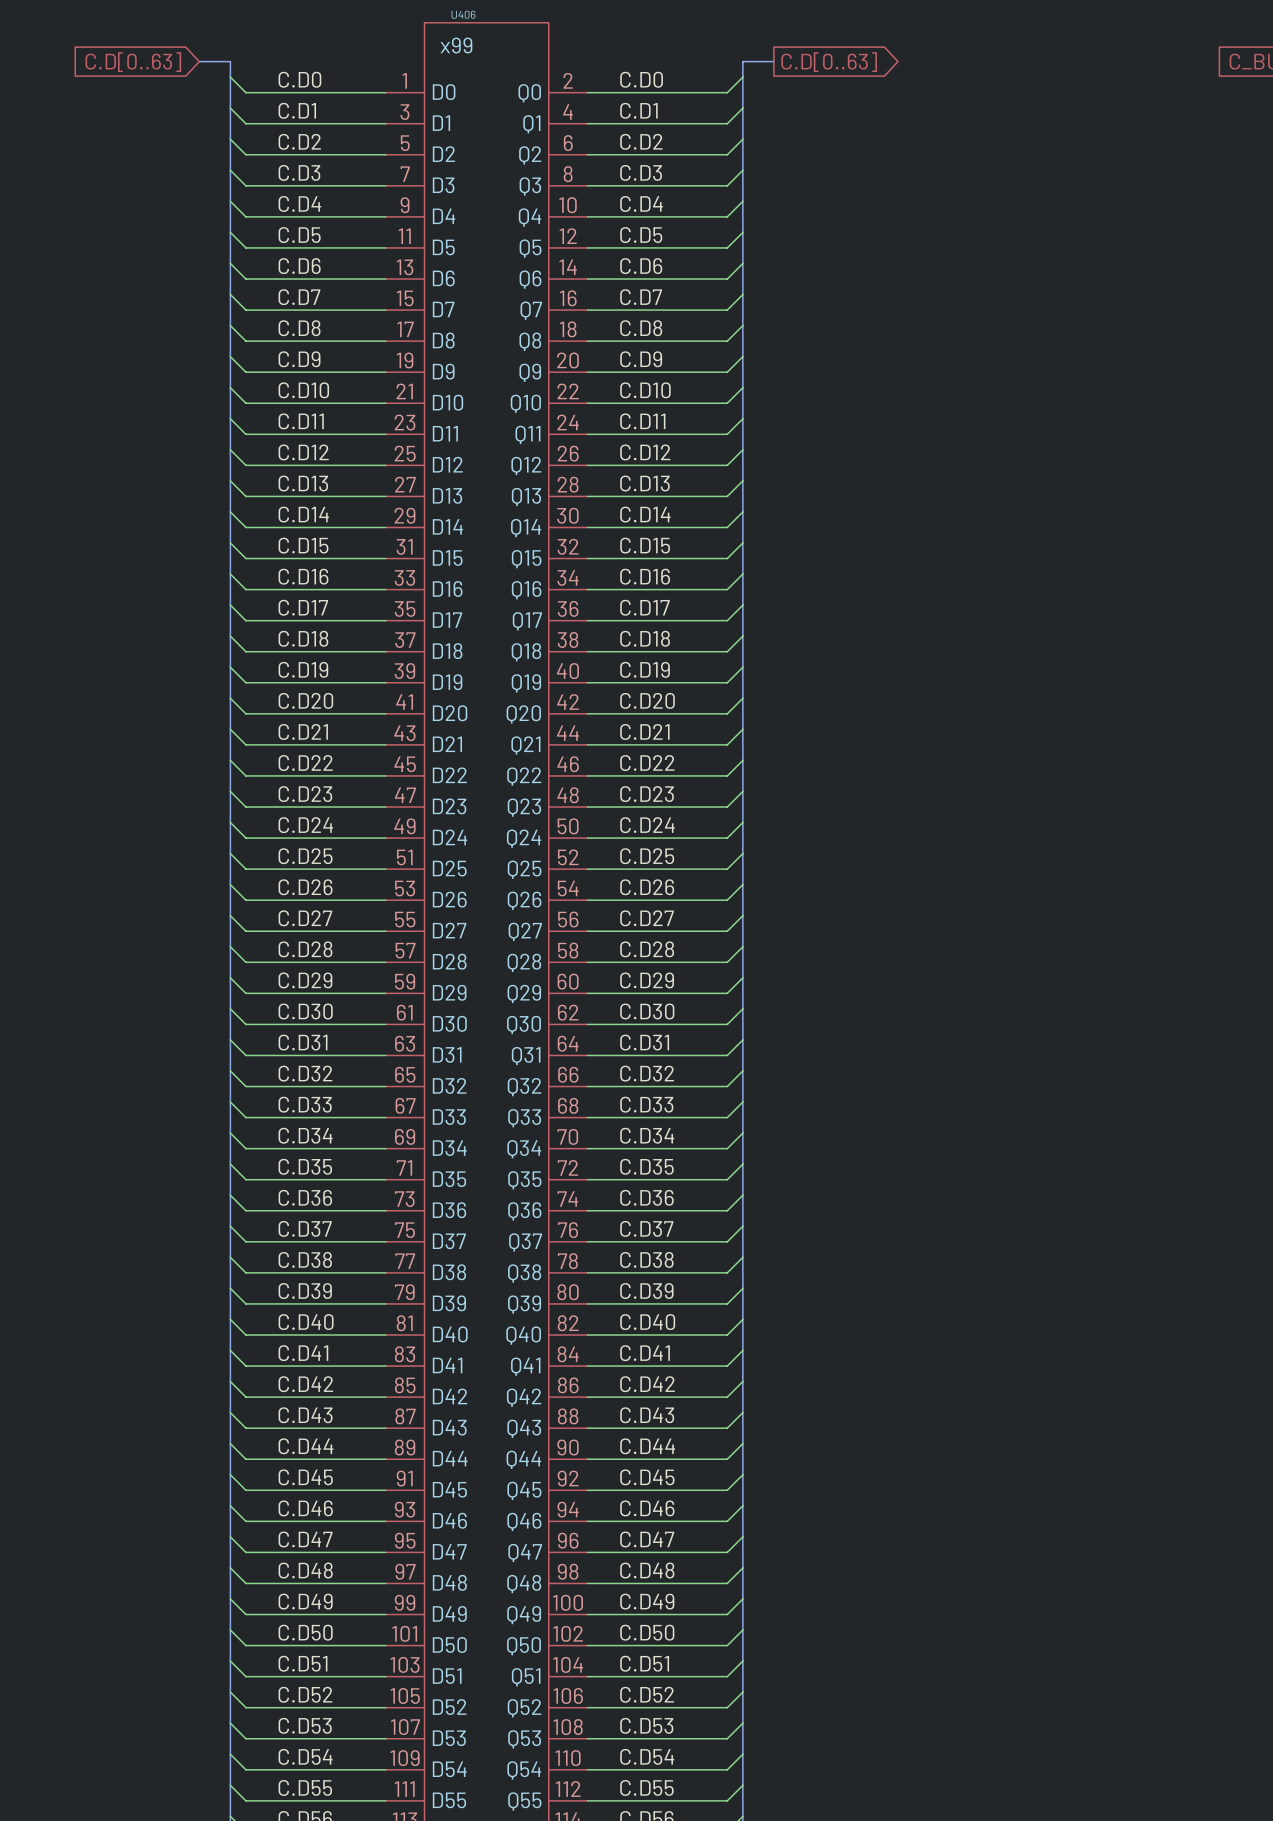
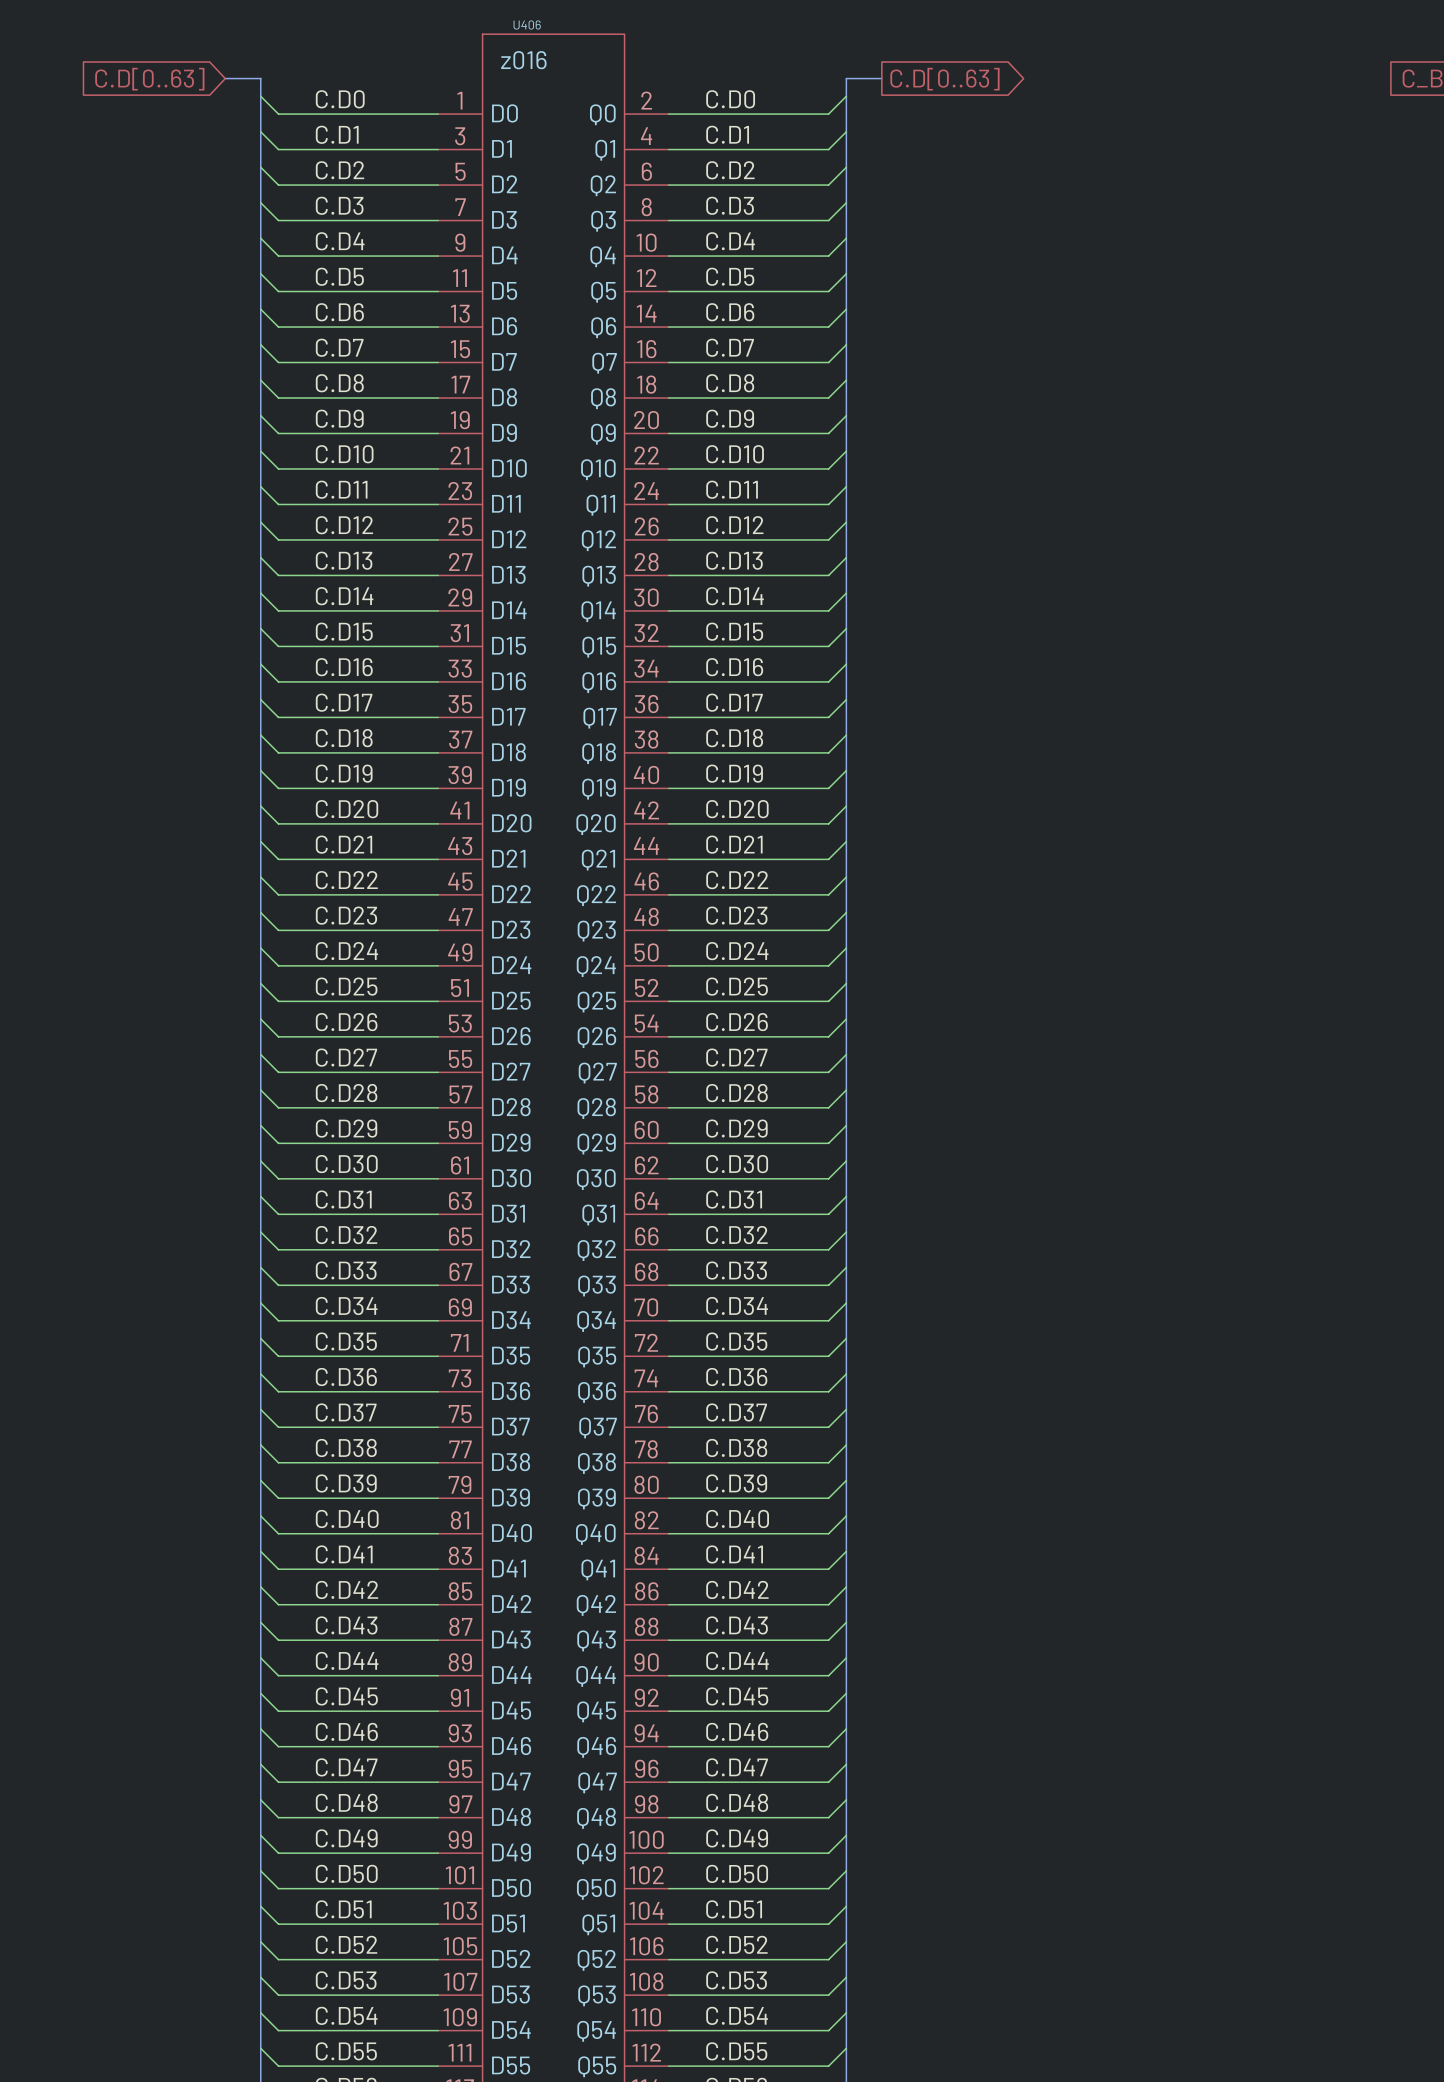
U406 text: x99 (456, 45) -> z016 (523, 60)

